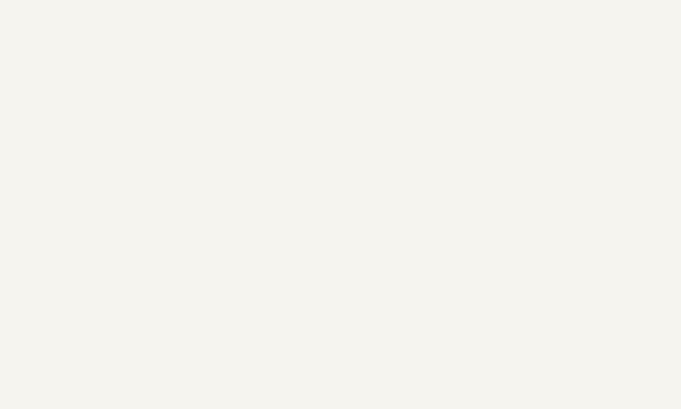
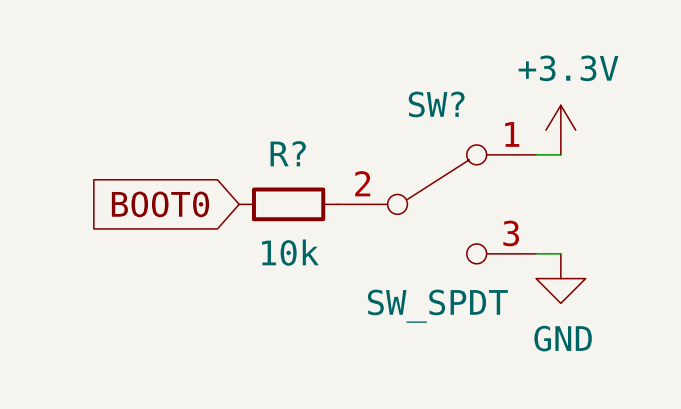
power symbol: none -> +3.3V (560, 130)
wire: none -> (536, 154) (560, 154)
global label: none -> BOOT0 (160, 204)
R?: none -> 10k (288, 204)
SW?: none -> SW_SPDT (437, 204)
wire: none -> (536, 253) (560, 253)
power symbol: none -> GND (560, 278)

